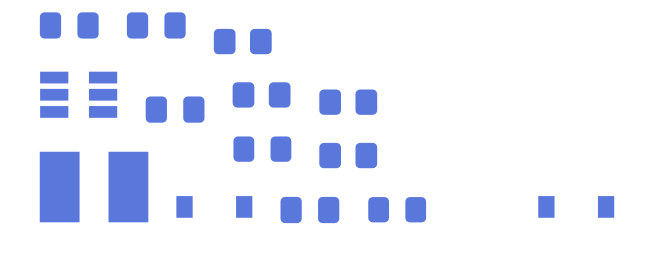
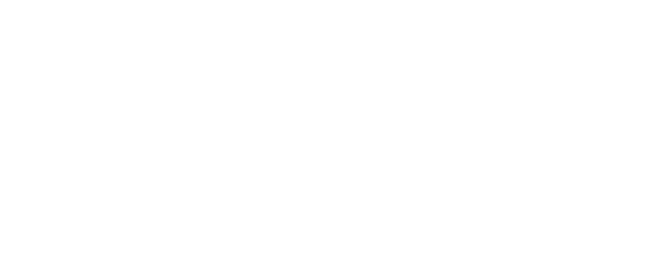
part: (69, 25) -> none
part: (156, 25) -> none
part: (242, 41) -> none
part: (78, 94) -> none
part: (261, 94) -> none
part: (348, 102) -> none
part: (175, 109) -> none
part: (262, 149) -> none
part: (348, 155) -> none
part: (94, 187) -> none
part: (214, 206) -> none
part: (576, 206) -> none
part: (397, 209) -> none
part: (309, 210) -> none

